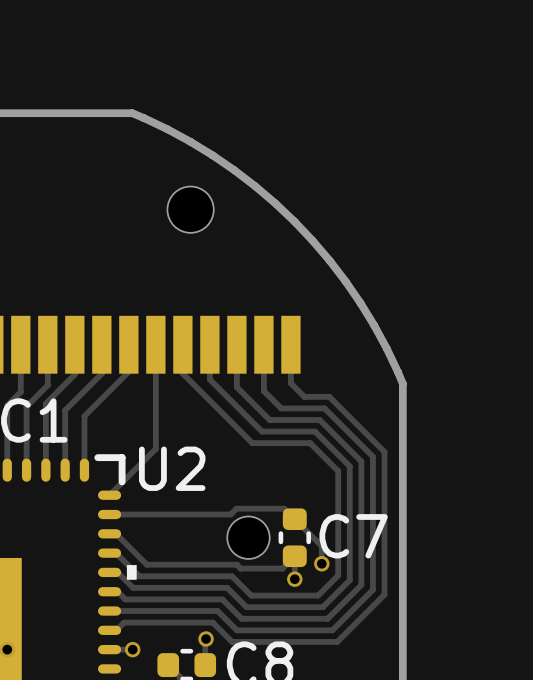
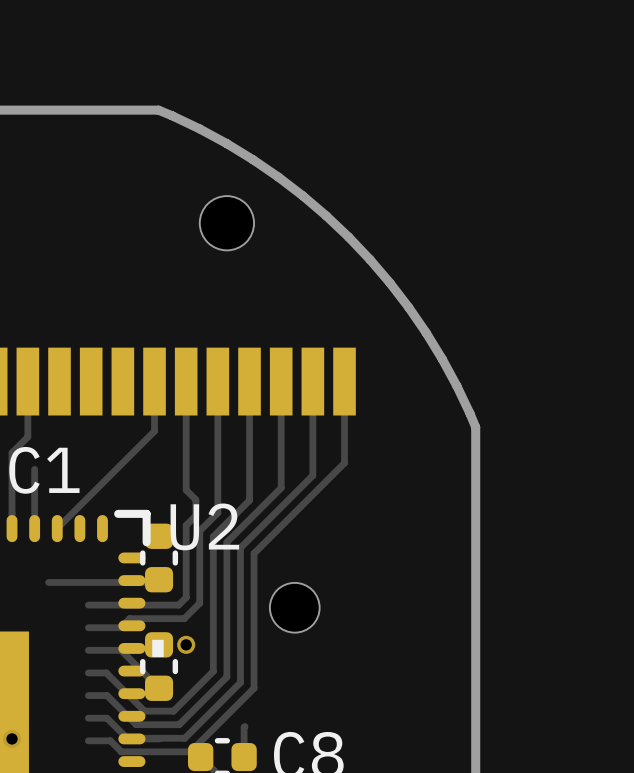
track: (47, 344) (47, 385) (26, 406) (26, 419) -> none
track: (74, 344) (74, 374) (45, 403) (45, 470) -> none
track: (101, 344) (101, 373) (65, 410) (65, 470) -> none
track: (128, 371) (84, 416) (84, 470) -> (154, 413) (154, 431) (57, 528)
track: (182, 373) (252, 443) (310, 443) (338, 471) (338, 575) (318, 595) (251, 595) (232, 576) (139, 576) (116, 553) -> (217, 415) (217, 512) (199, 530) (199, 603) (184, 618) (129, 618) (120, 627) (88, 627)
track: (209, 379) (261, 431) (315, 431) (349, 466) (349, 580) (322, 607) (246, 607) (227, 587) (133, 587) (117, 572) -> (249, 422) (249, 500) (213, 536) (213, 671) (173, 711) (144, 711) (106, 672) (88, 672)
track: (290, 383) (304, 396) (329, 396) (384, 451) (384, 594) (337, 641) (232, 641) (212, 622) (124, 622) (116, 630) -> (344, 426) (344, 462) (254, 553) (254, 688) (190, 751) (121, 751) (110, 740) (88, 740)
track: (236, 387) (269, 420) (319, 420) (361, 461) (361, 585) (327, 618) (241, 618) (222, 599) (125, 599) (117, 591) -> (281, 431) (281, 487) (226, 542) (226, 676) (179, 724) (136, 724) (107, 695) (88, 695)
track: (263, 391) (281, 408) (324, 408) (372, 456) (372, 589) (332, 630) (236, 630) (217, 611) (109, 611) -> (312, 435) (312, 475) (240, 547) (240, 682) (184, 738) (127, 738) (107, 718) (88, 718)
track: (155, 437) (155, 448) (109, 495) -> (186, 490) (195, 499) (195, 515) (186, 525) (186, 597) (178, 605) (88, 605)
part: none -> (159, 557)
track: none -> (159, 579) (156, 582) (48, 582)
track: (109, 514) (230, 514) (236, 508) (284, 508) (321, 546) (321, 563) -> none
track: (116, 533) (146, 564) (236, 564) (240, 568) (282, 568) (294, 556) (294, 579) -> none
C7: (294, 537) -> none
via: (321, 563) -> none
via: none -> (186, 644)
track: none -> (88, 650) (121, 650) (159, 688)
via: (294, 579) -> none
part: none -> (159, 666)
via: (206, 639) -> none
via: (132, 649) -> none

